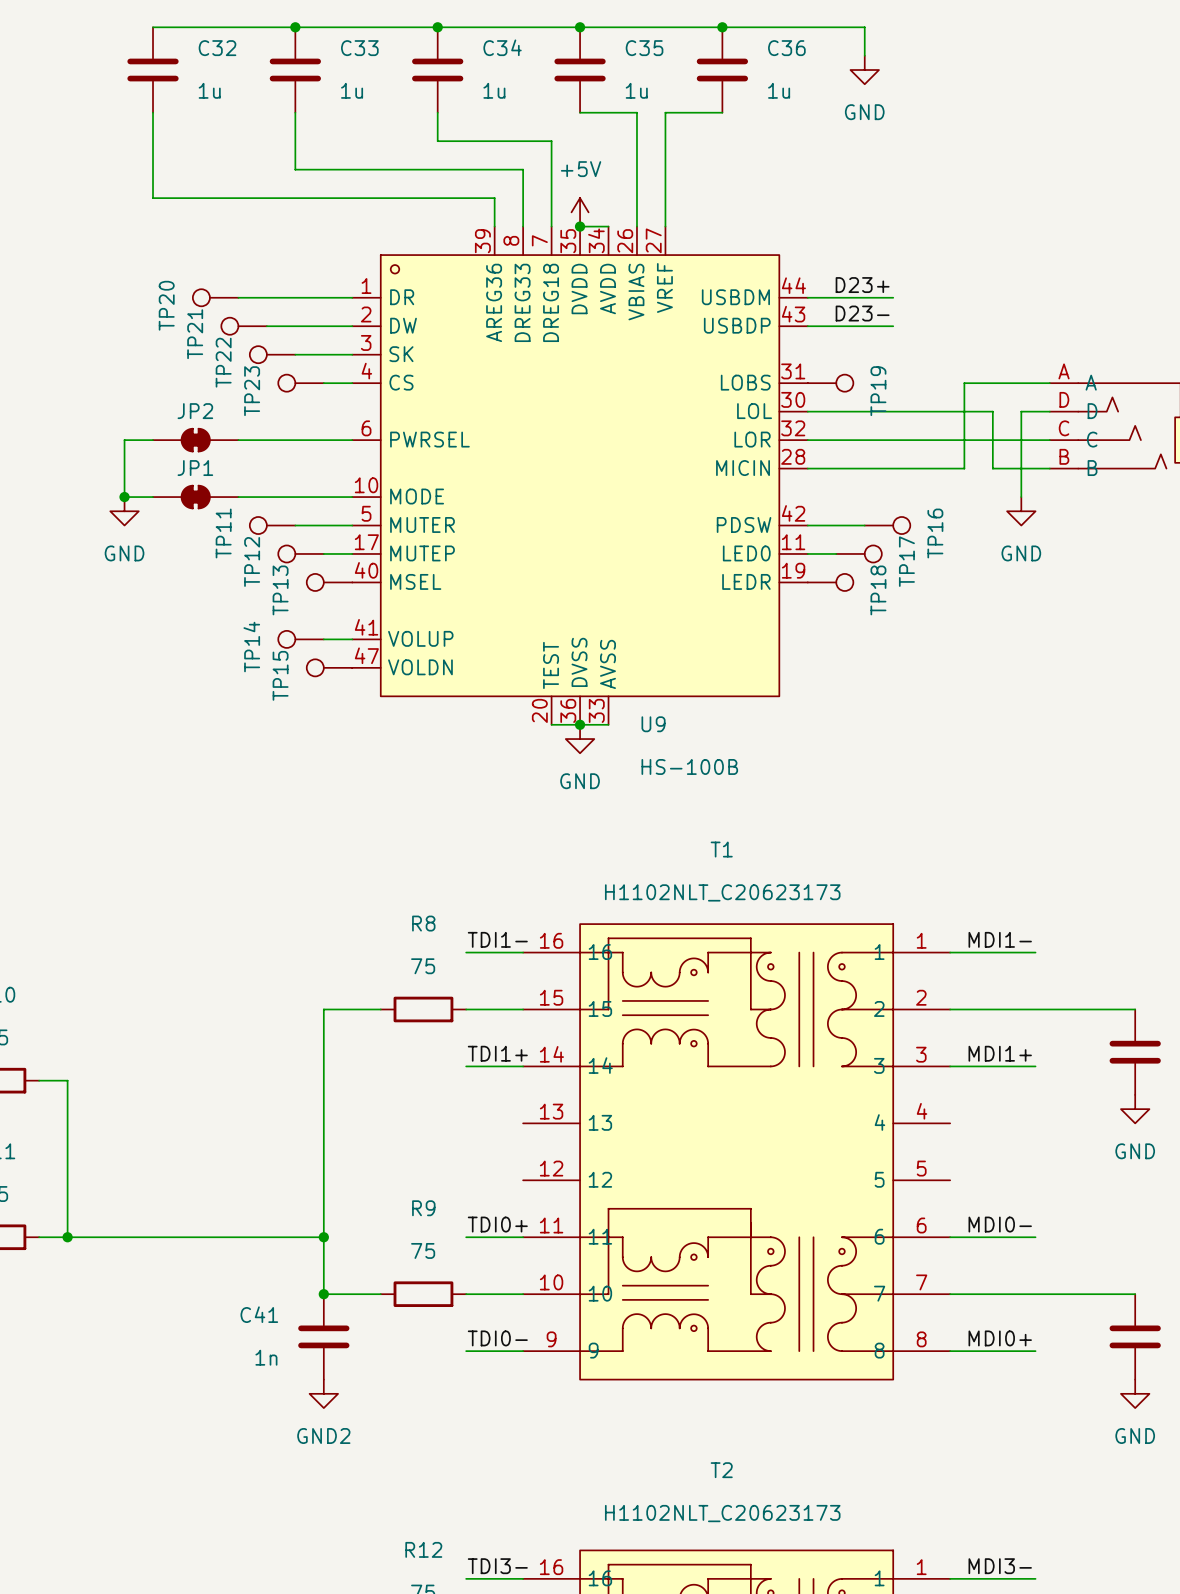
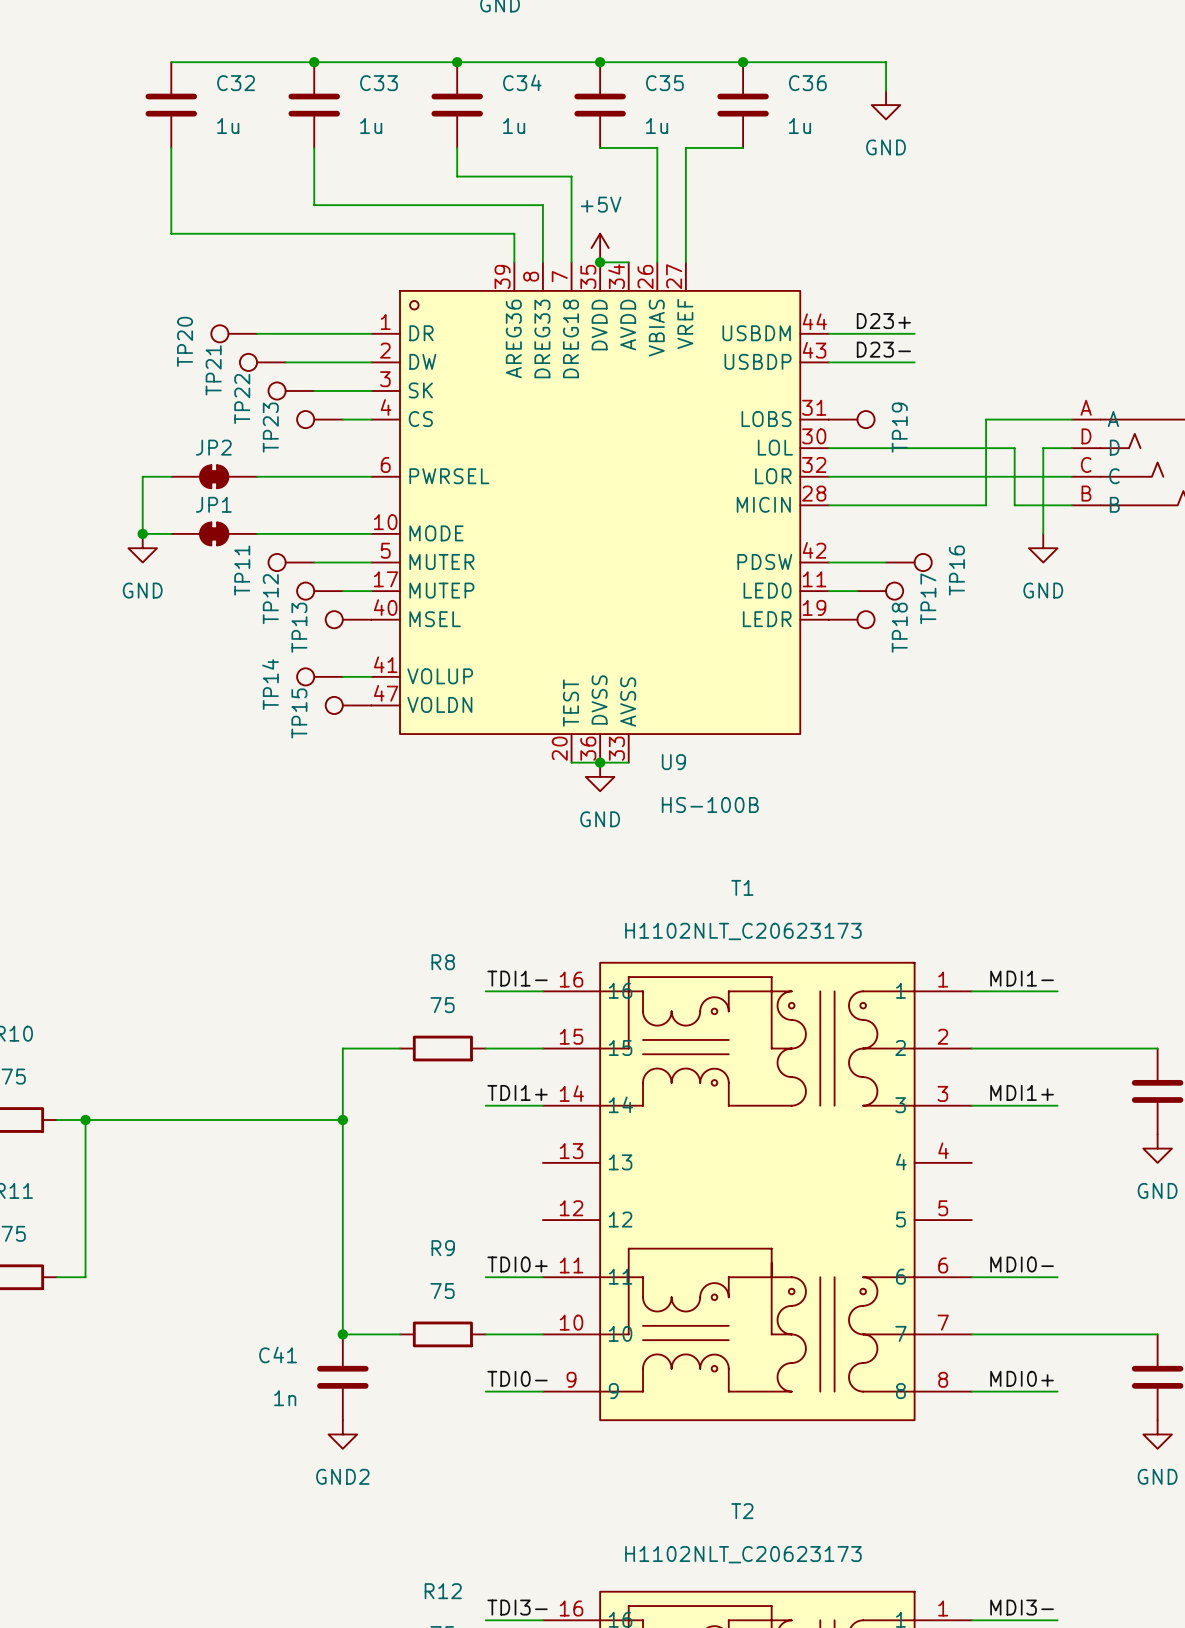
junction: none -> (85, 1120)
junction: none -> (342, 1120)
wire: (67, 1237) (323, 1237) -> (85, 1120) (342, 1120)
junction: (67, 1237) -> none
junction: (323, 1237) -> none

